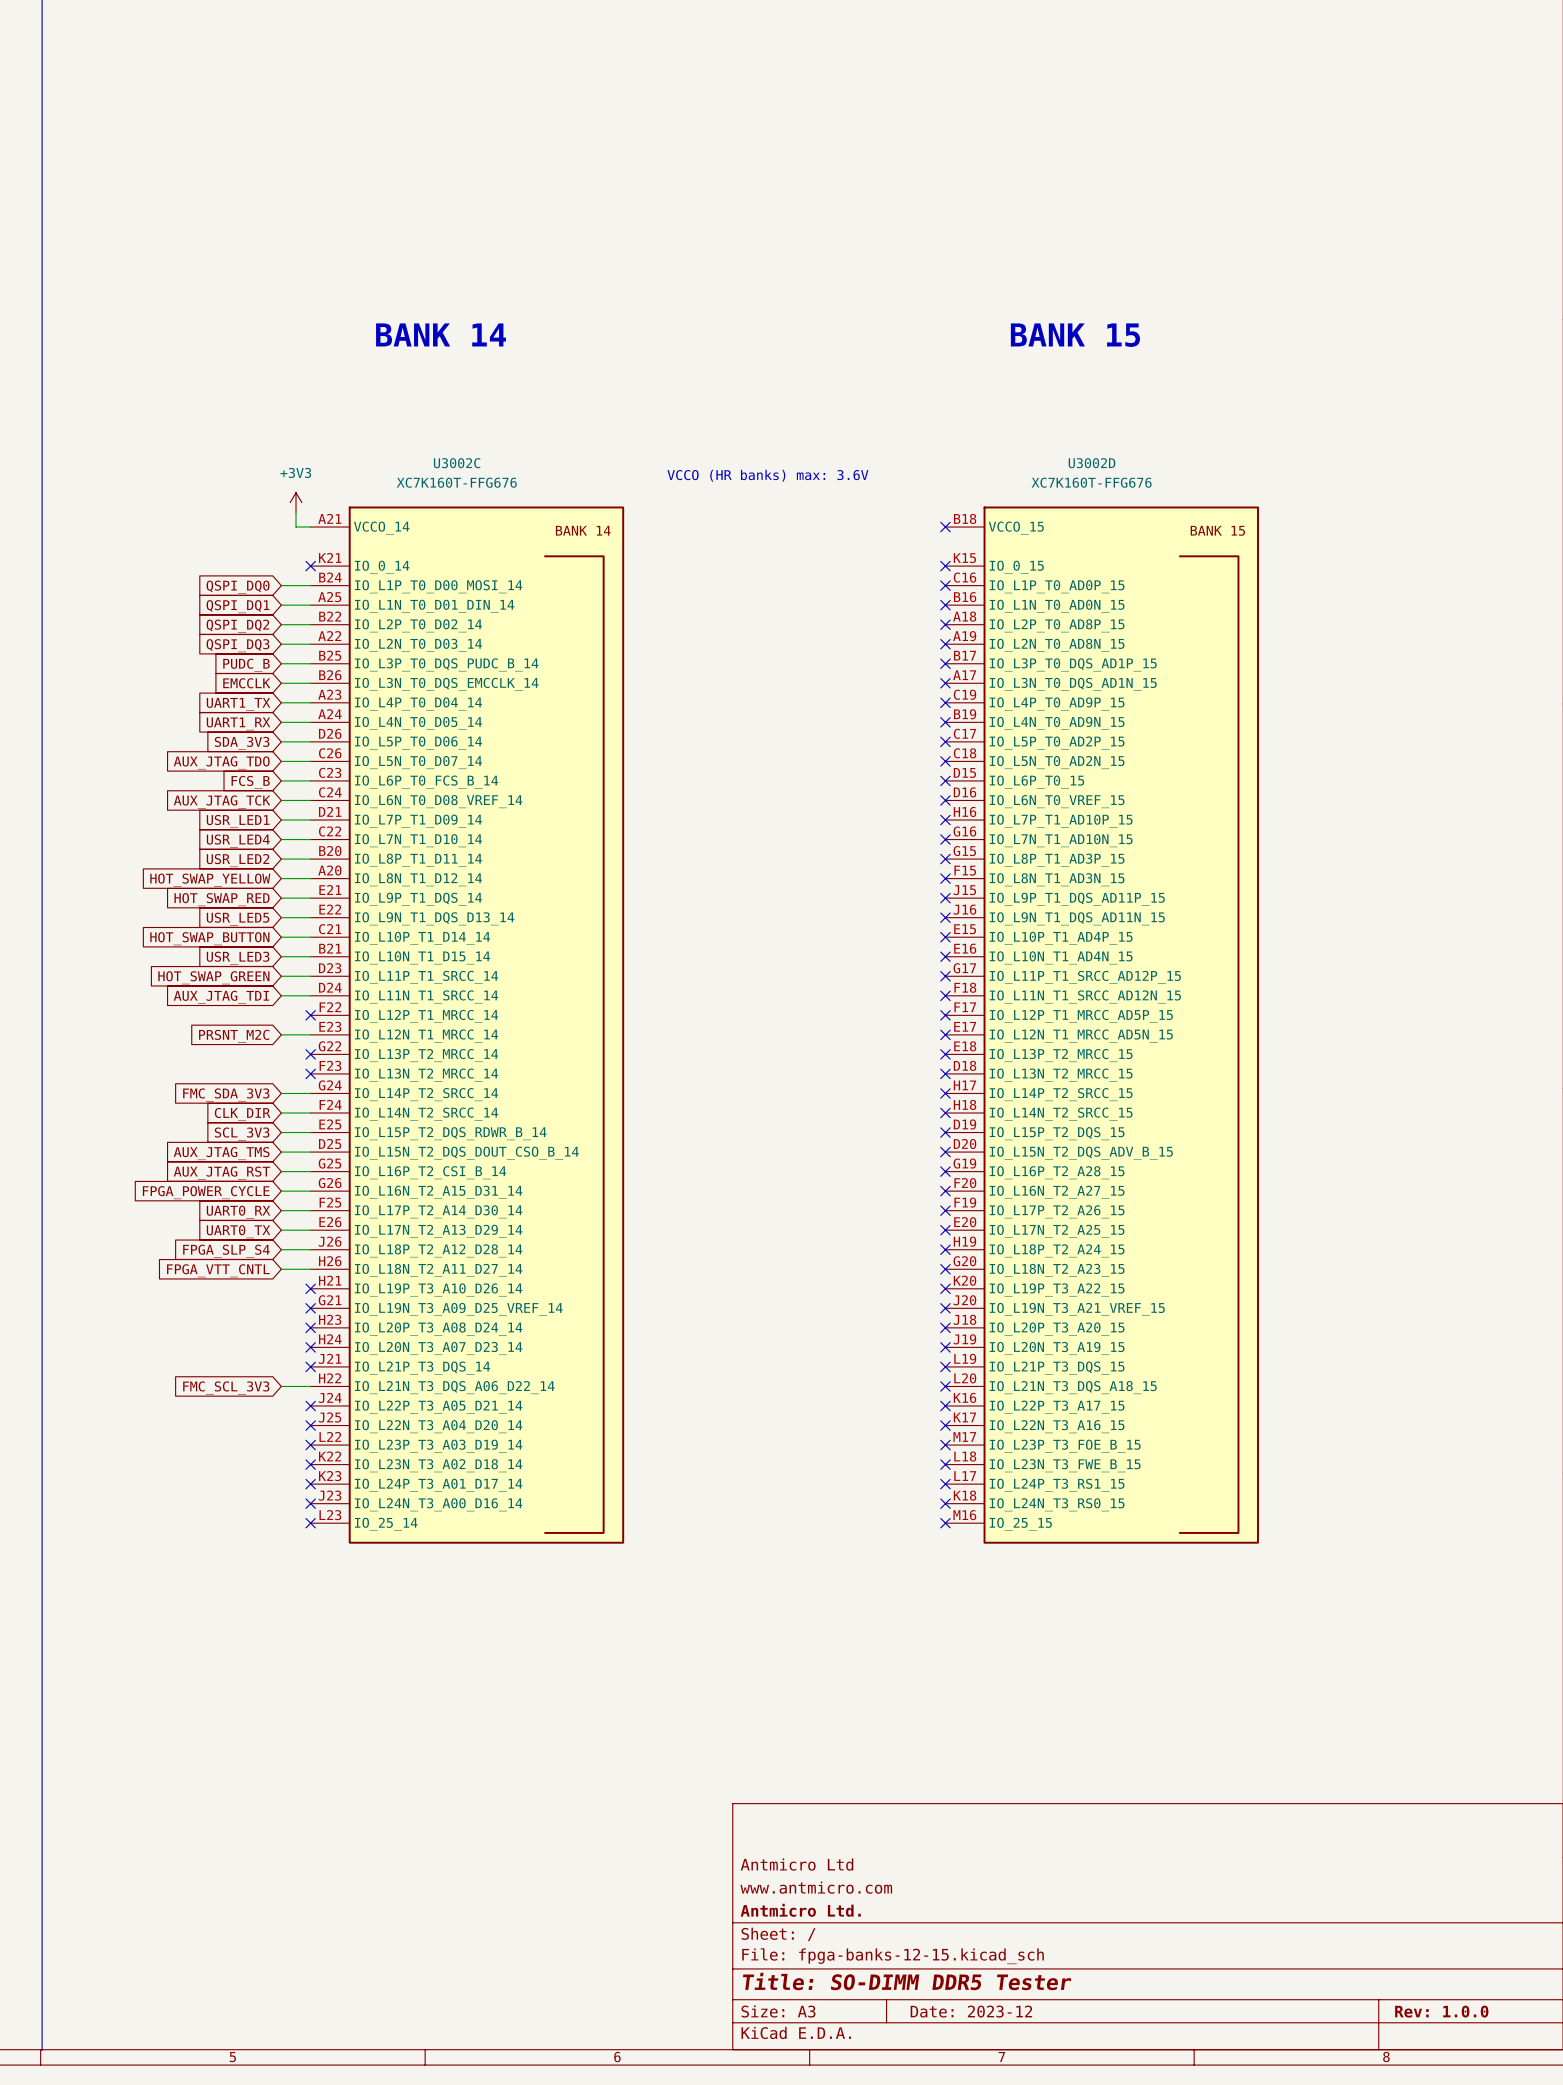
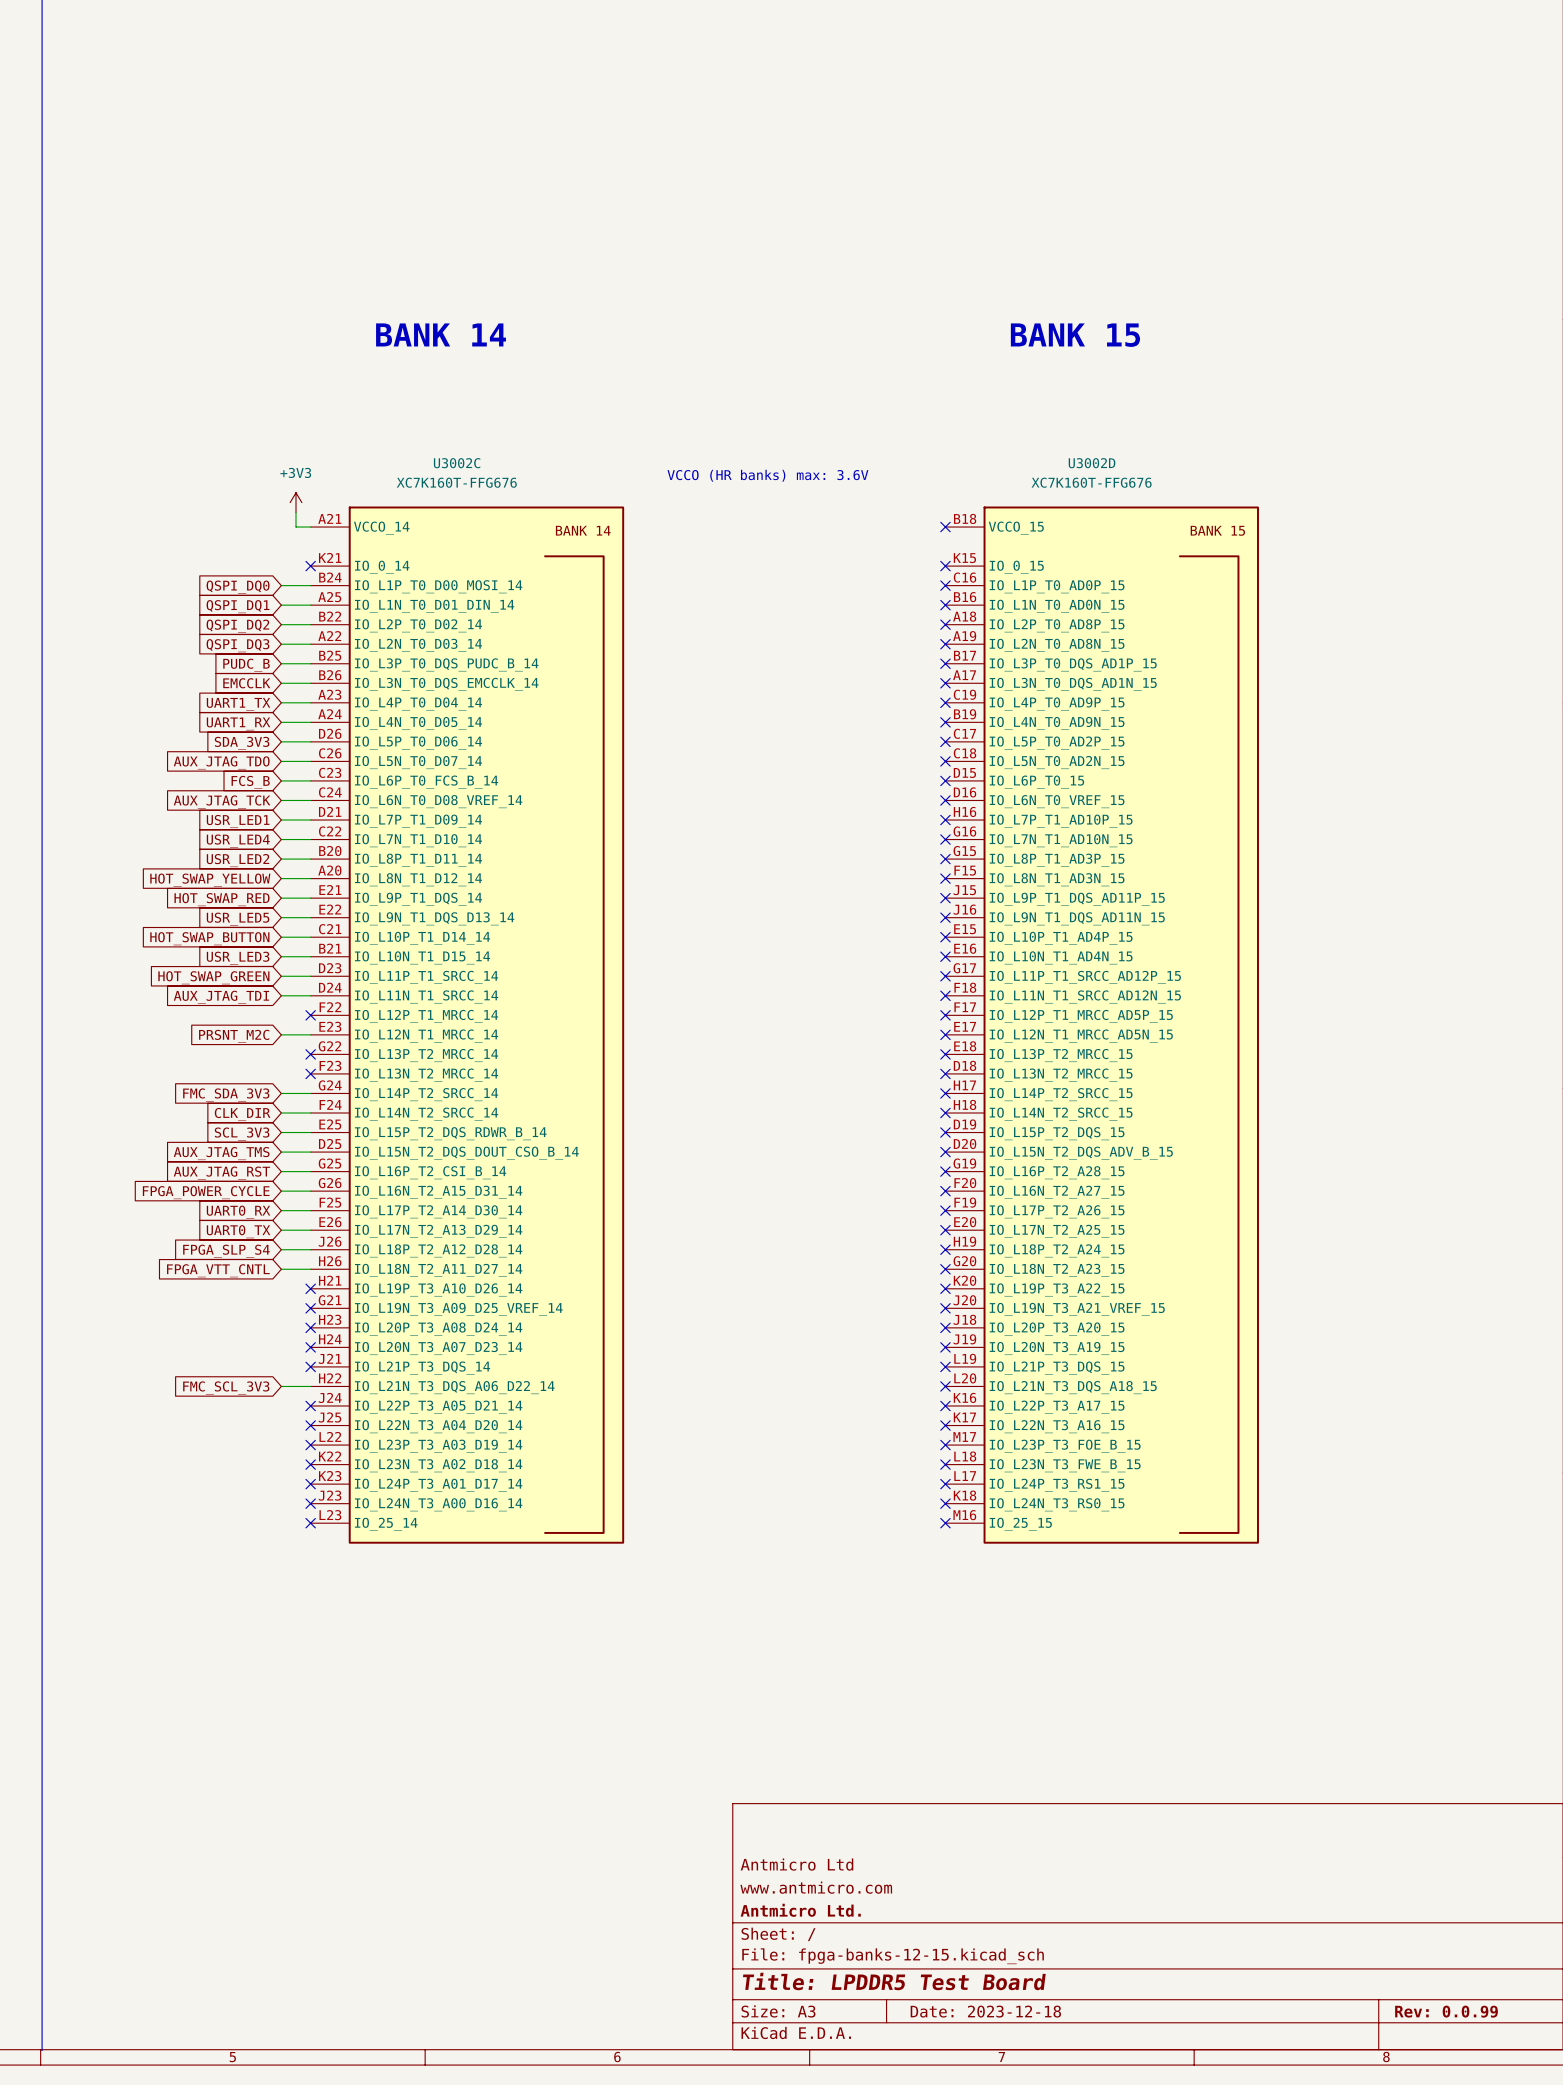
title block: Title: SO-DIMM DDR5 Tester (907, 1981) -> Title: LPDDR5 Test Board (894, 1981)
title block: Date: 2023-12 (971, 2011) -> Date: 2023-12-18 (985, 2011)
title block: Rev: 1.0.0 (1441, 2011) -> Rev: 0.0.99 (1446, 2011)

